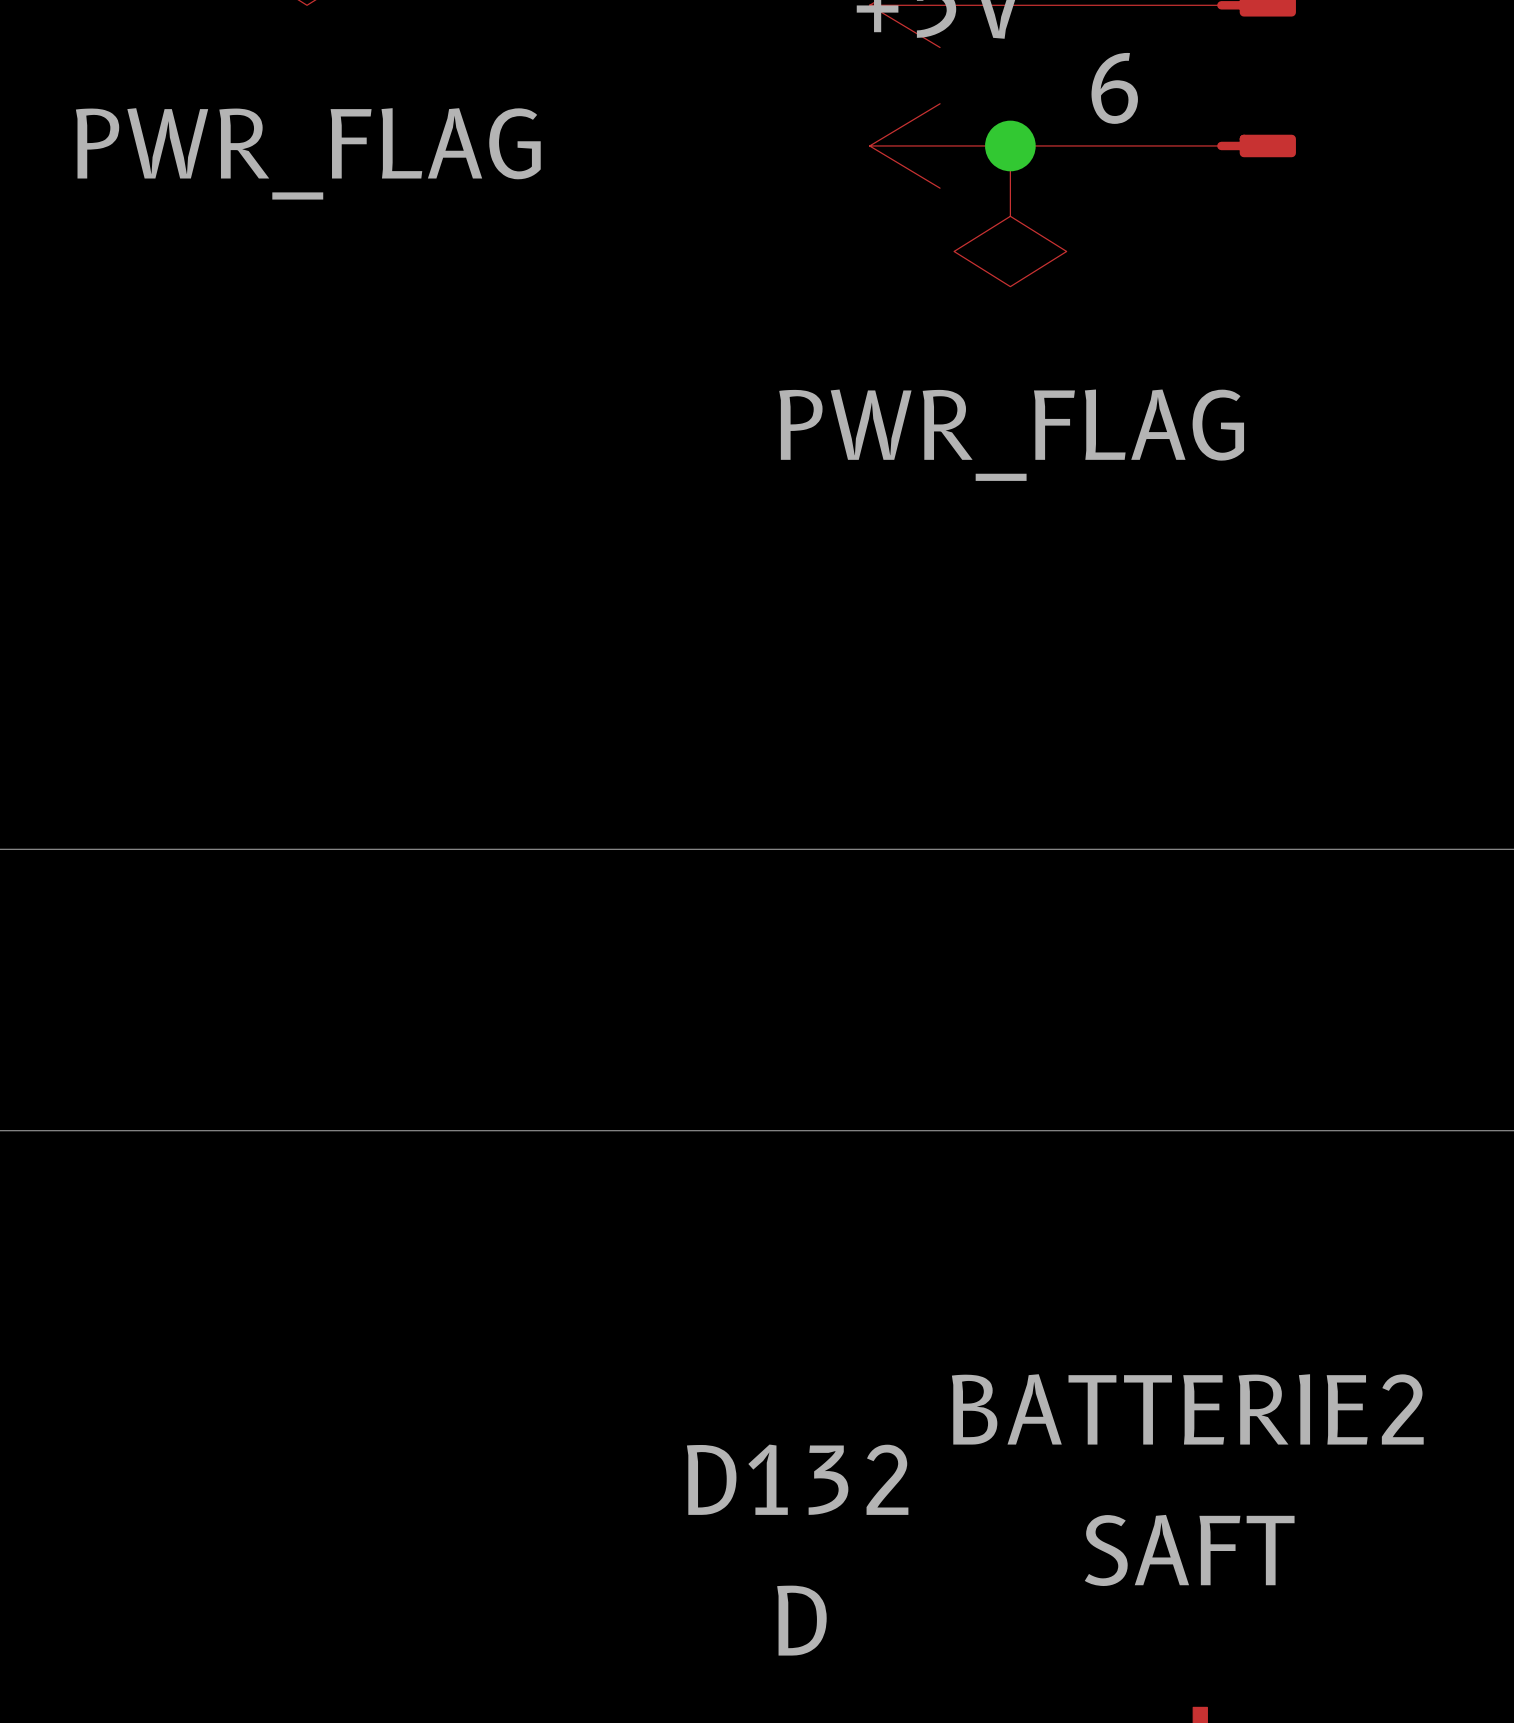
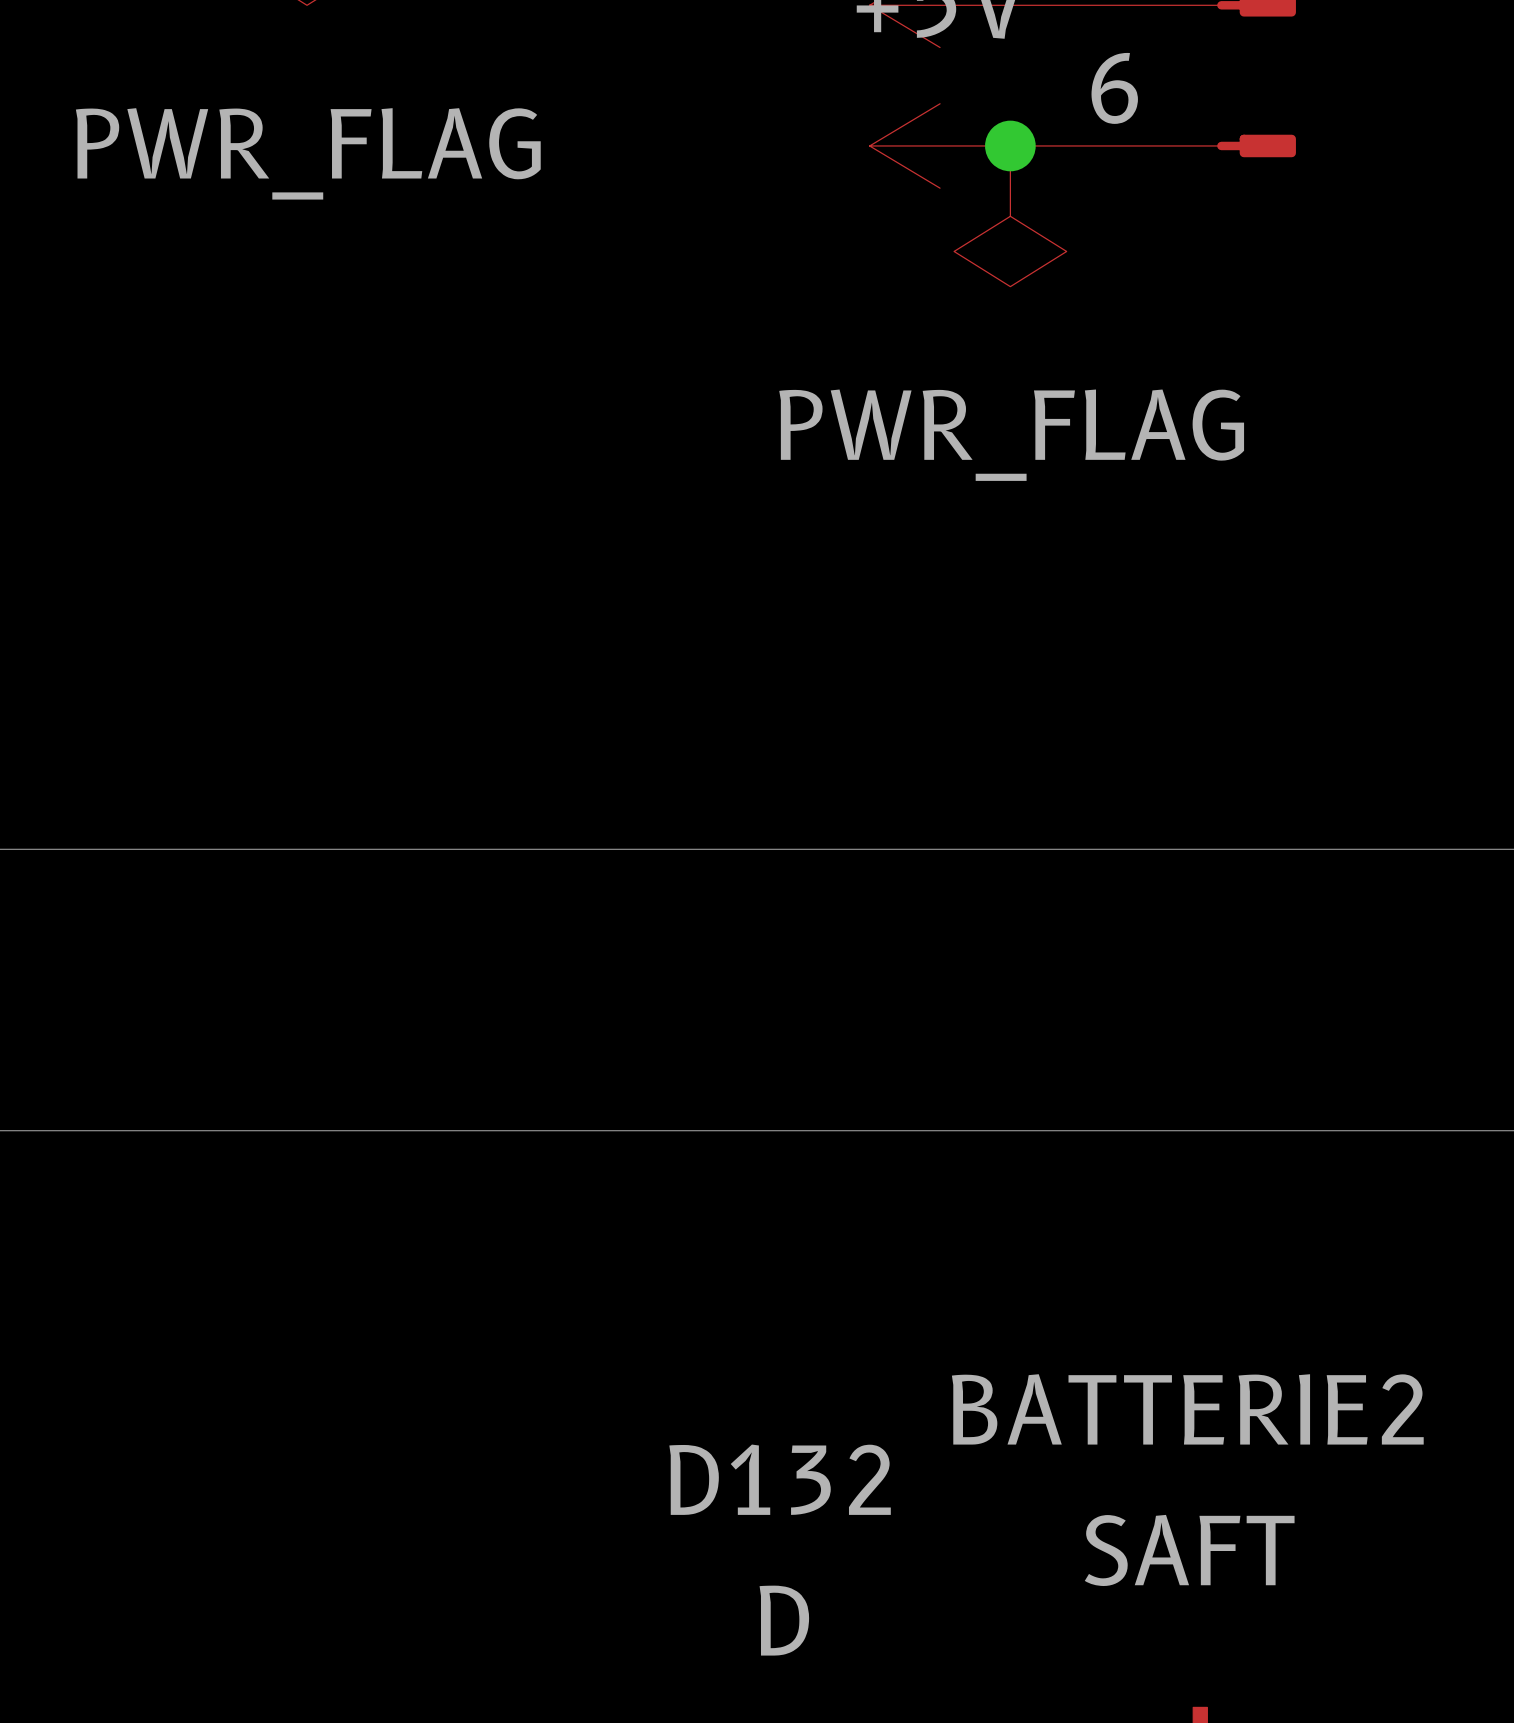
D132 name position: D132 (797, 1479) -> D132 (780, 1479)
D132 value position: D (801, 1620) -> D (784, 1620)

